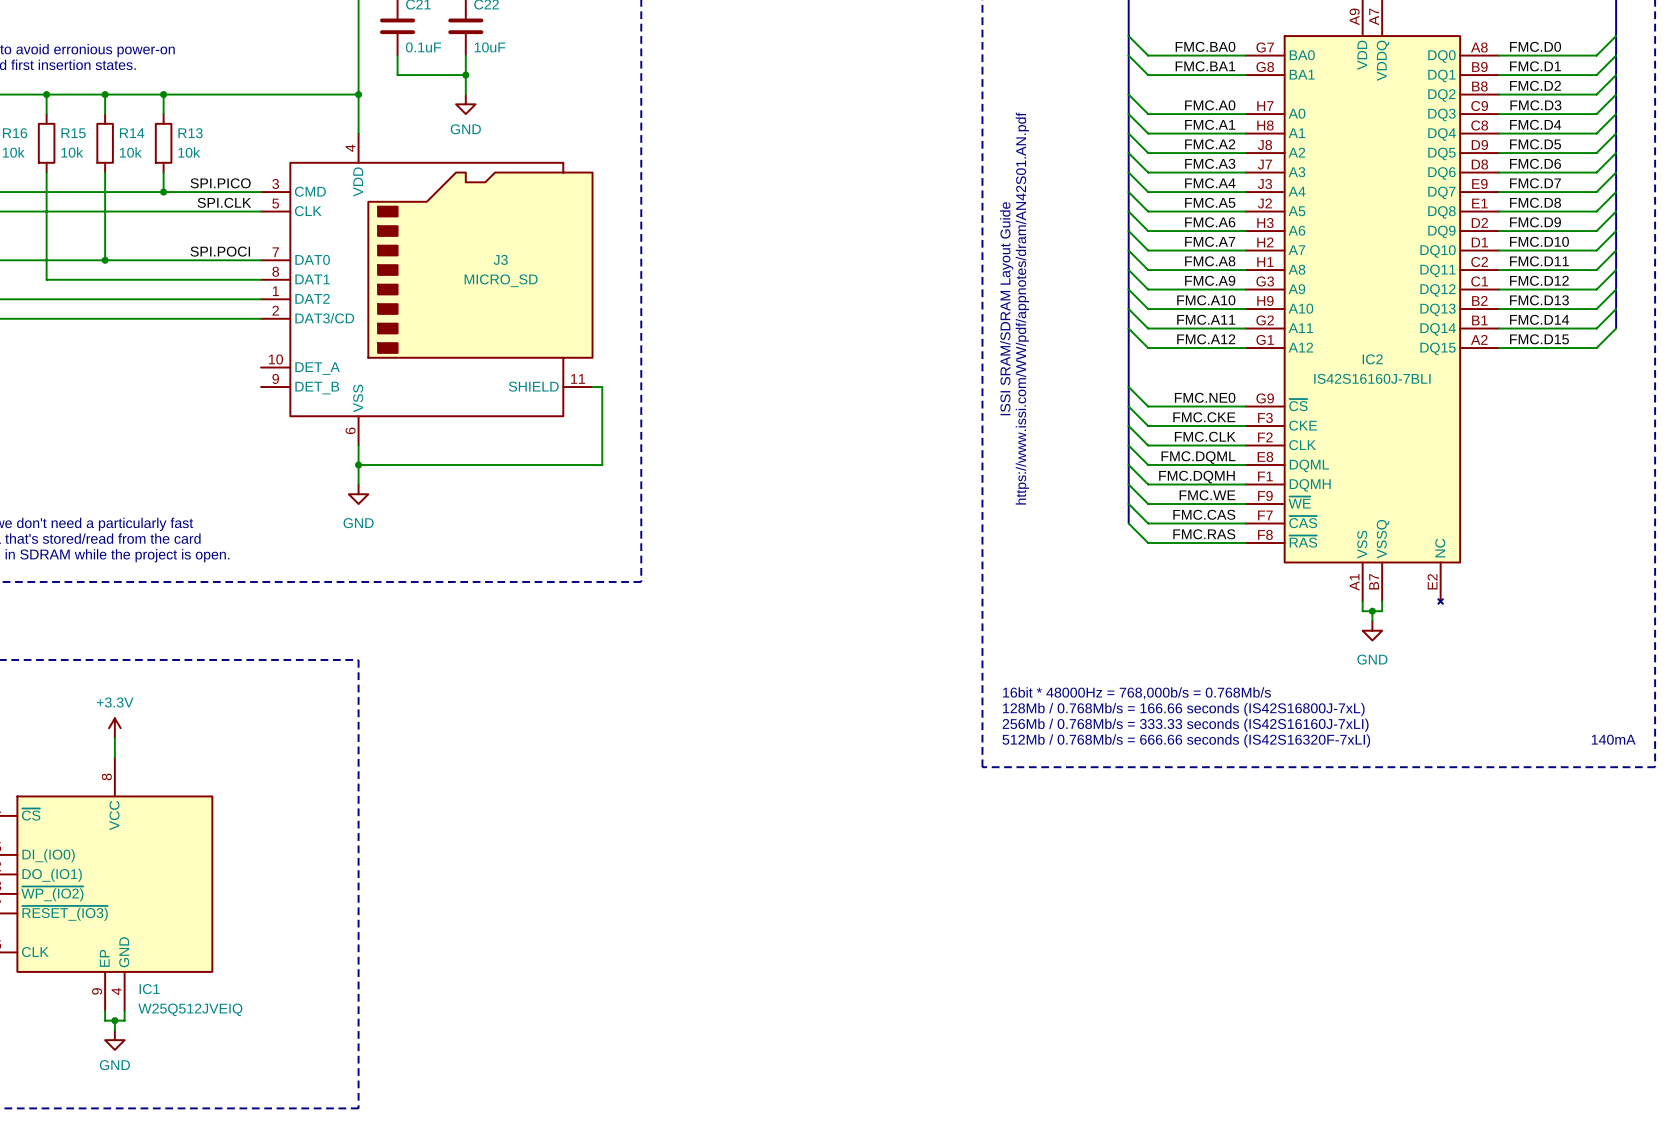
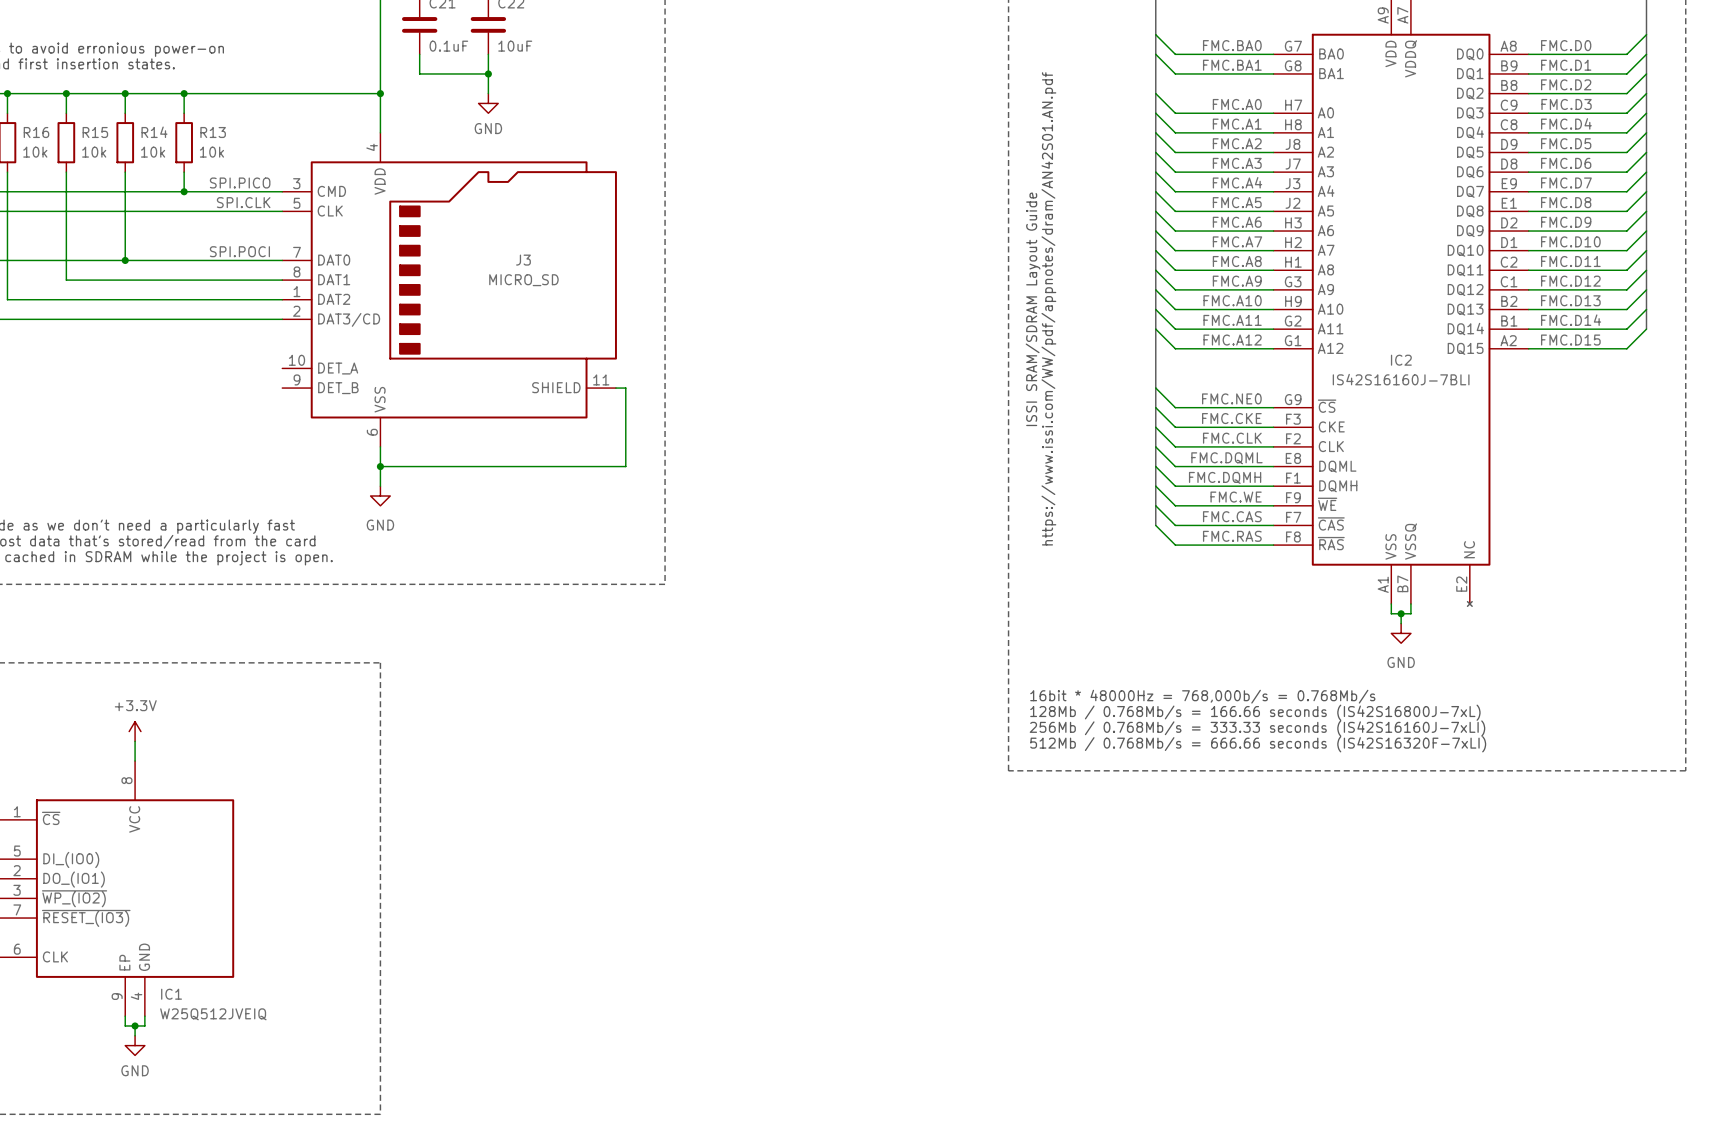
text: 140mA (1613, 739) -> none

